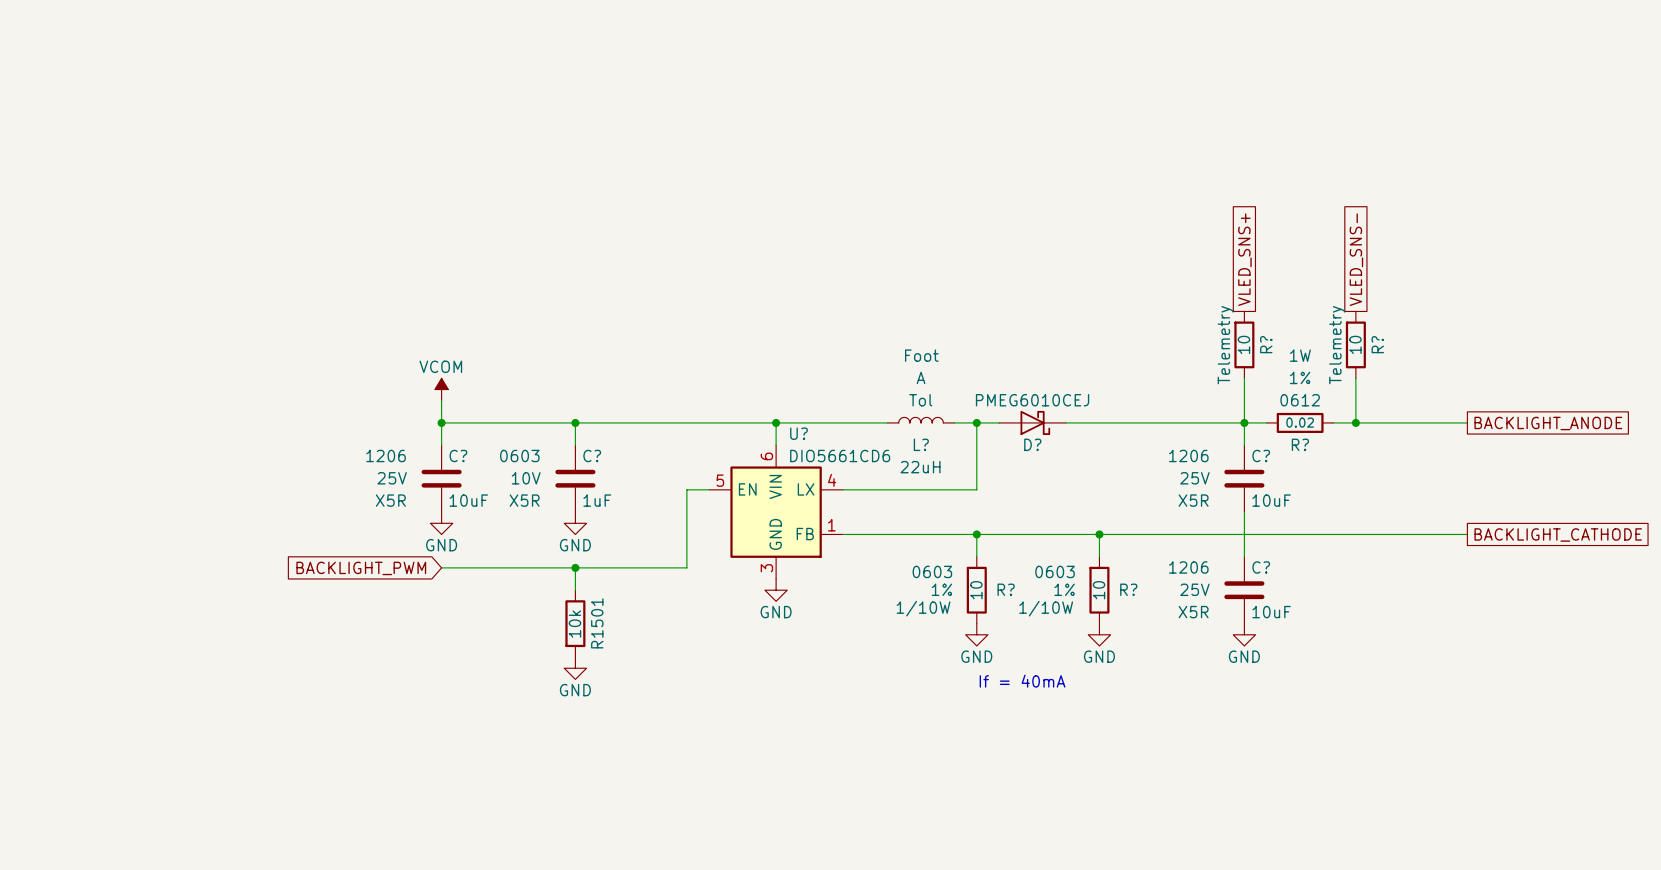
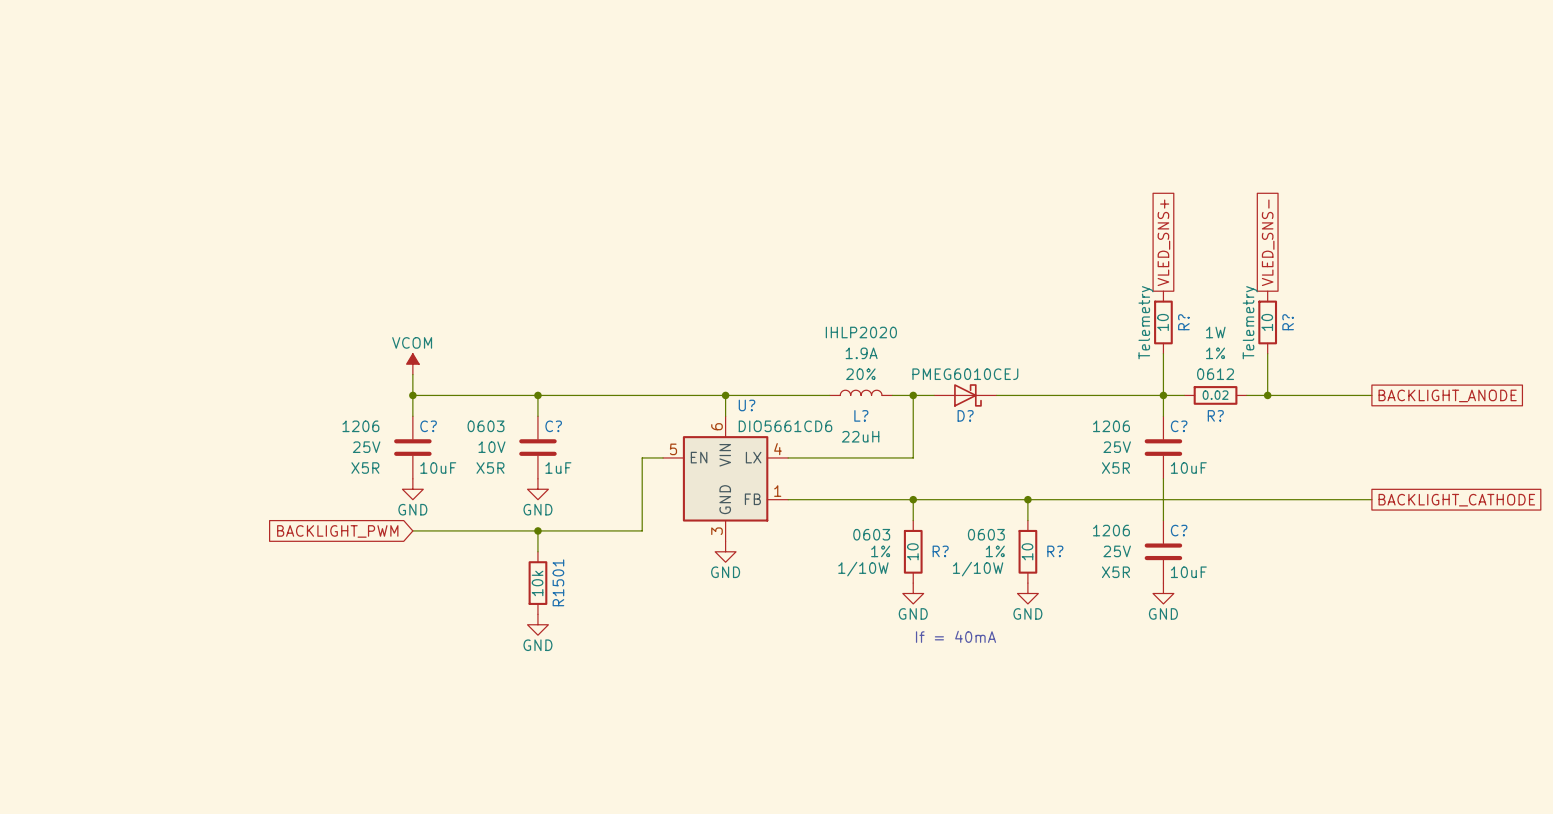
L? text: Foot (921, 355) -> IHLP2020 (861, 332)
L? text: A (921, 377) -> 1.9A (861, 353)
L? text: Tol (920, 400) -> 20% (860, 374)

